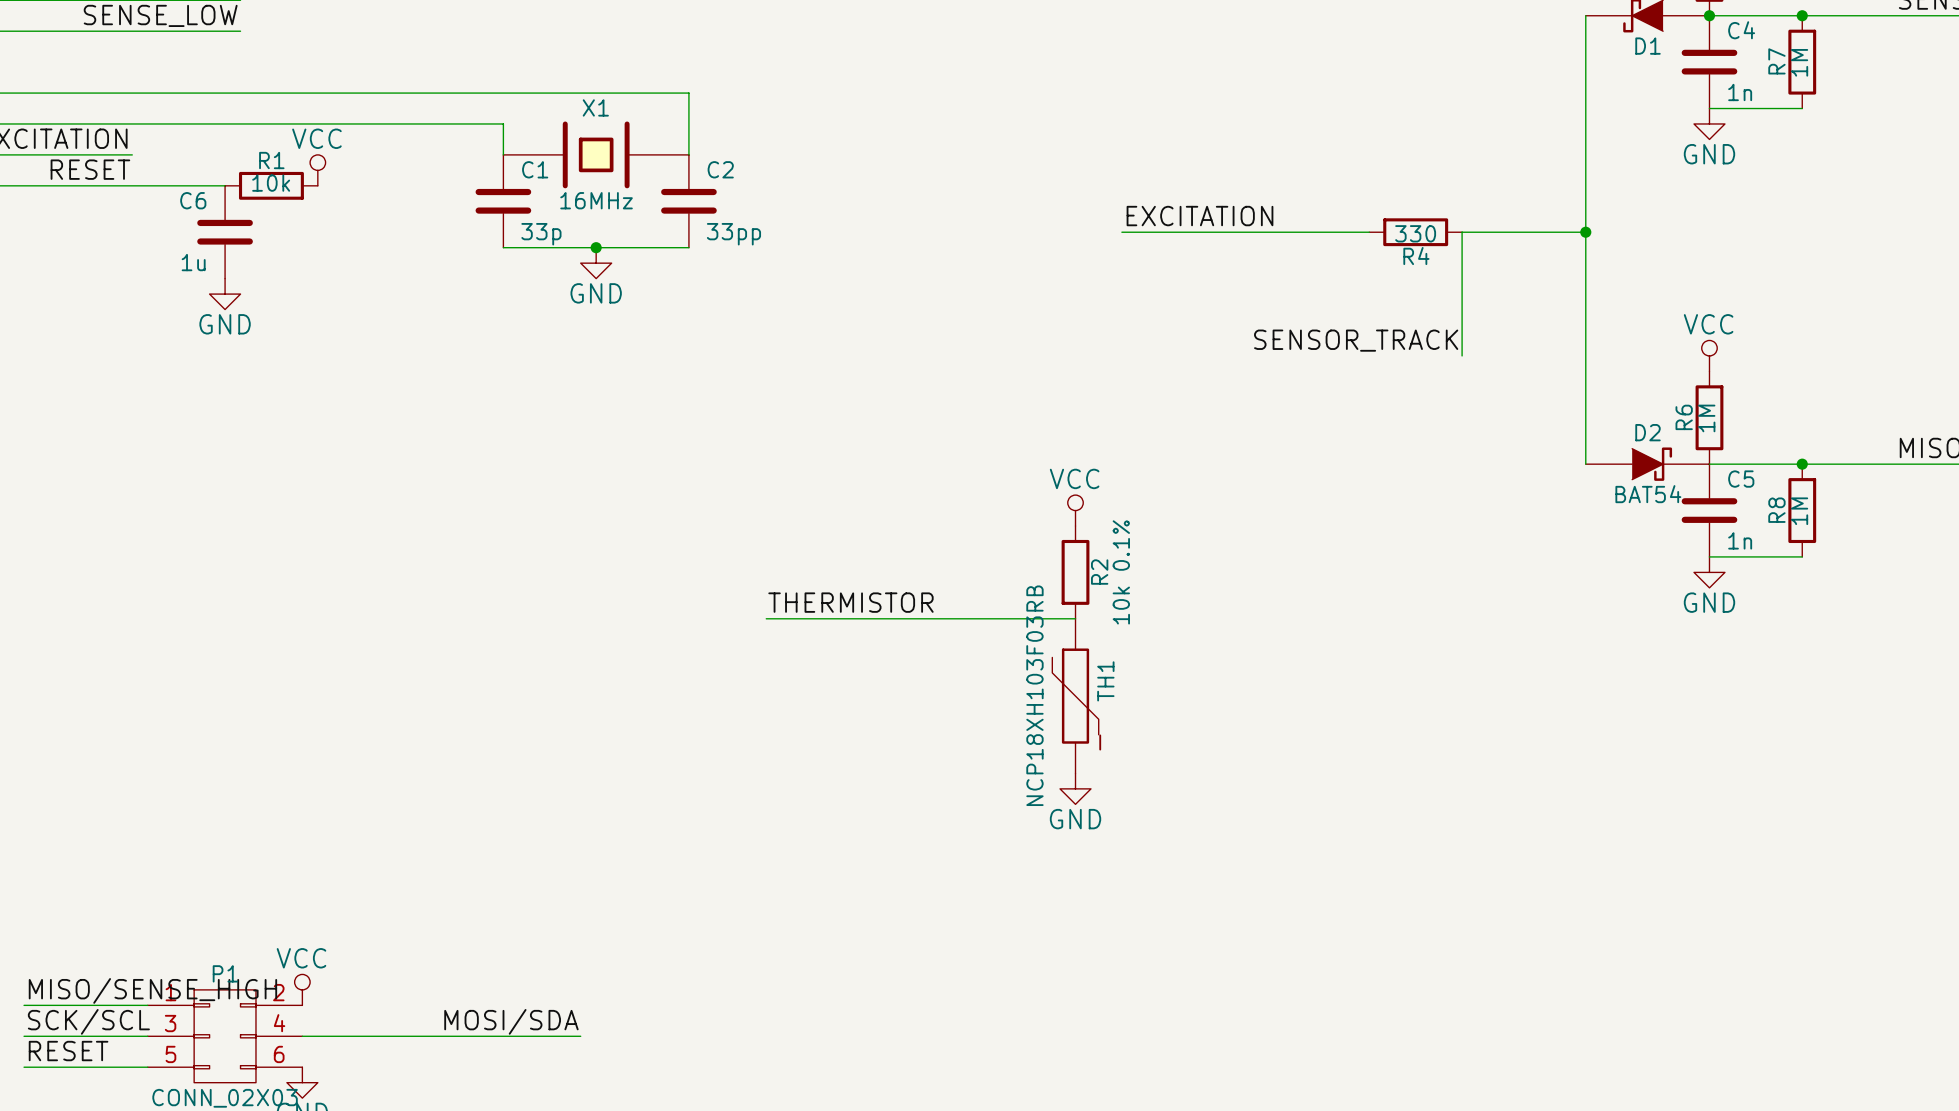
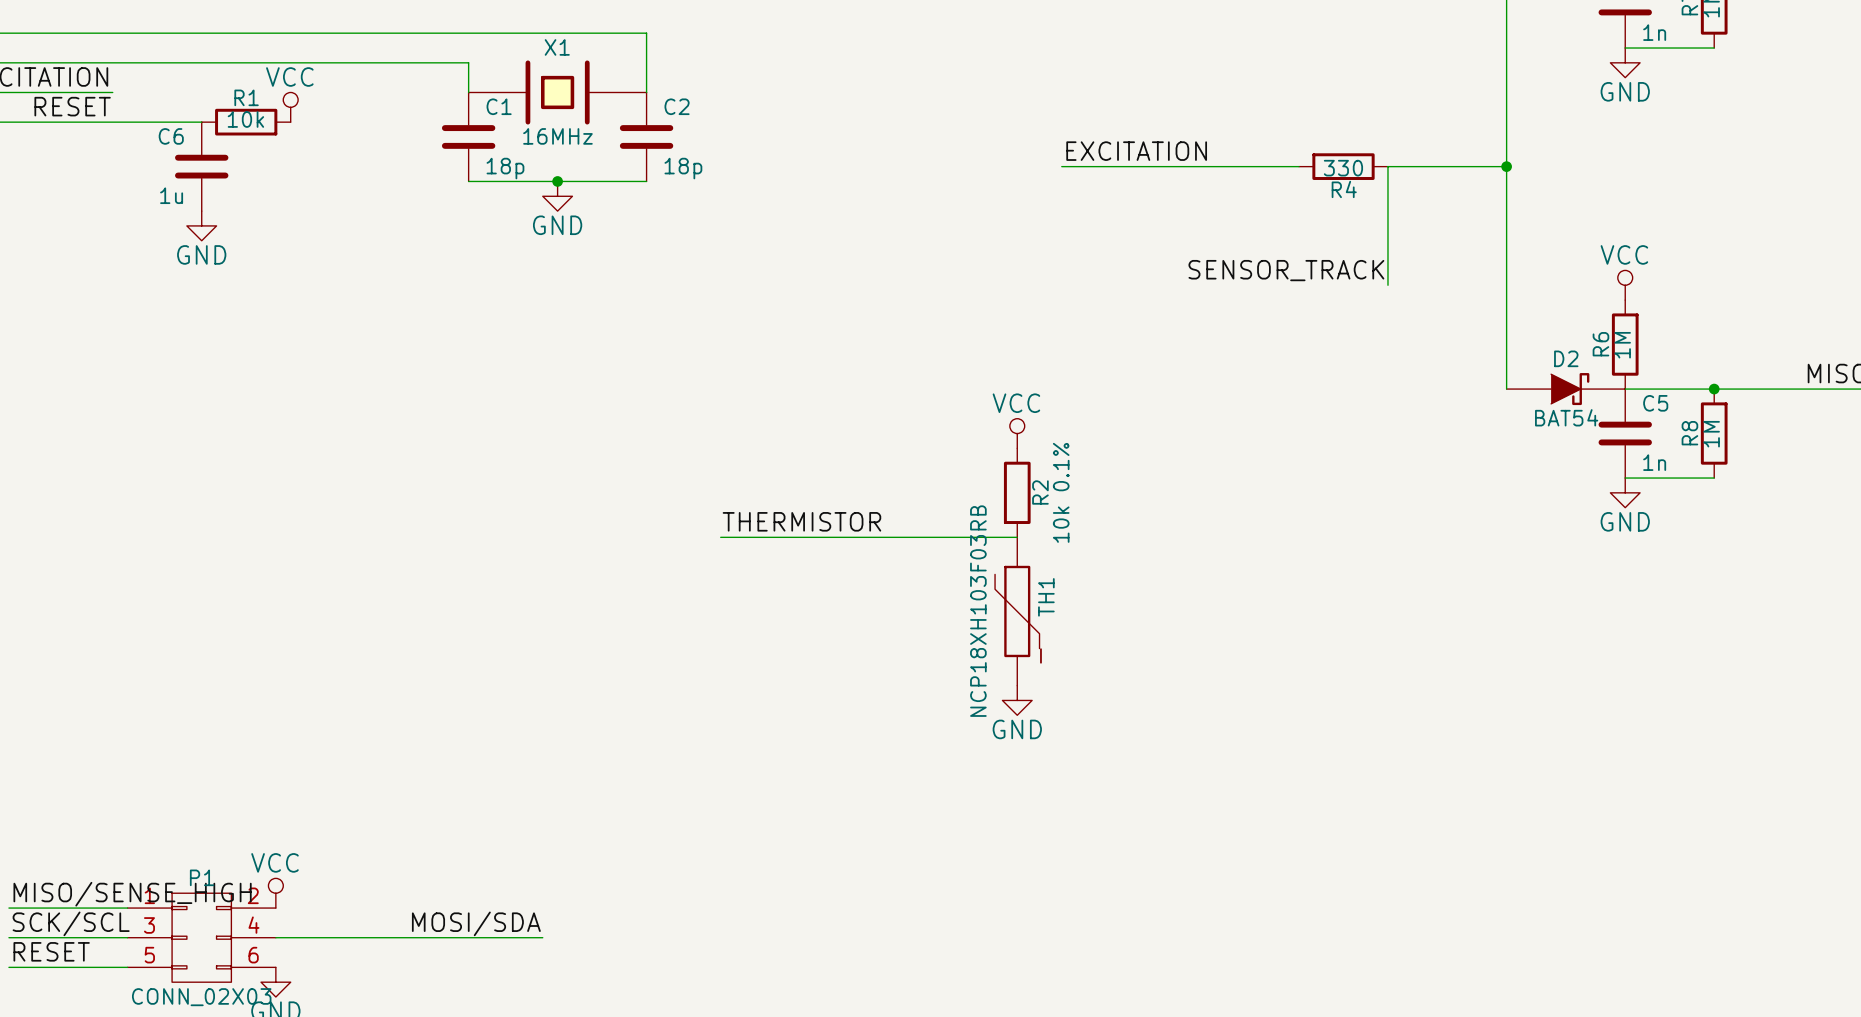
C1 value: 33p (541, 234) -> 18p (505, 168)
C2 value: 33pp (733, 234) -> 18p (683, 168)

